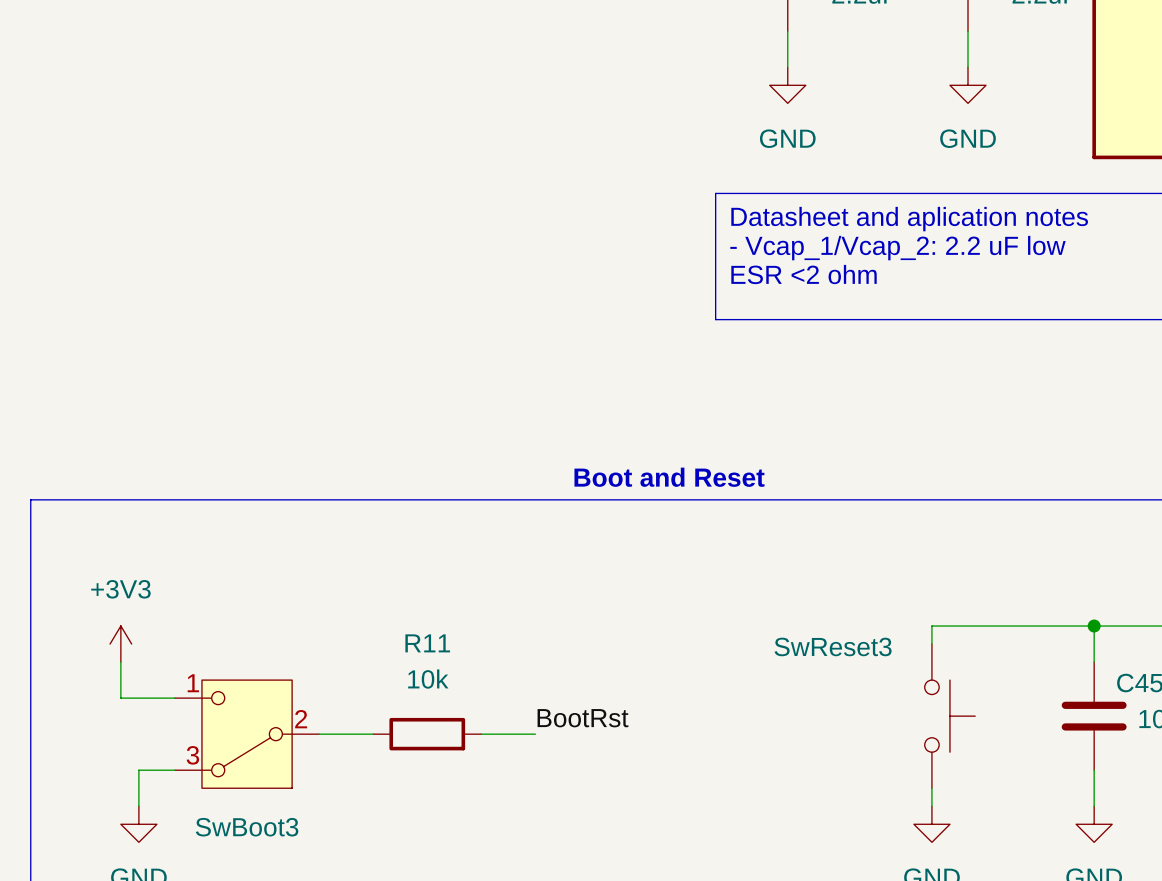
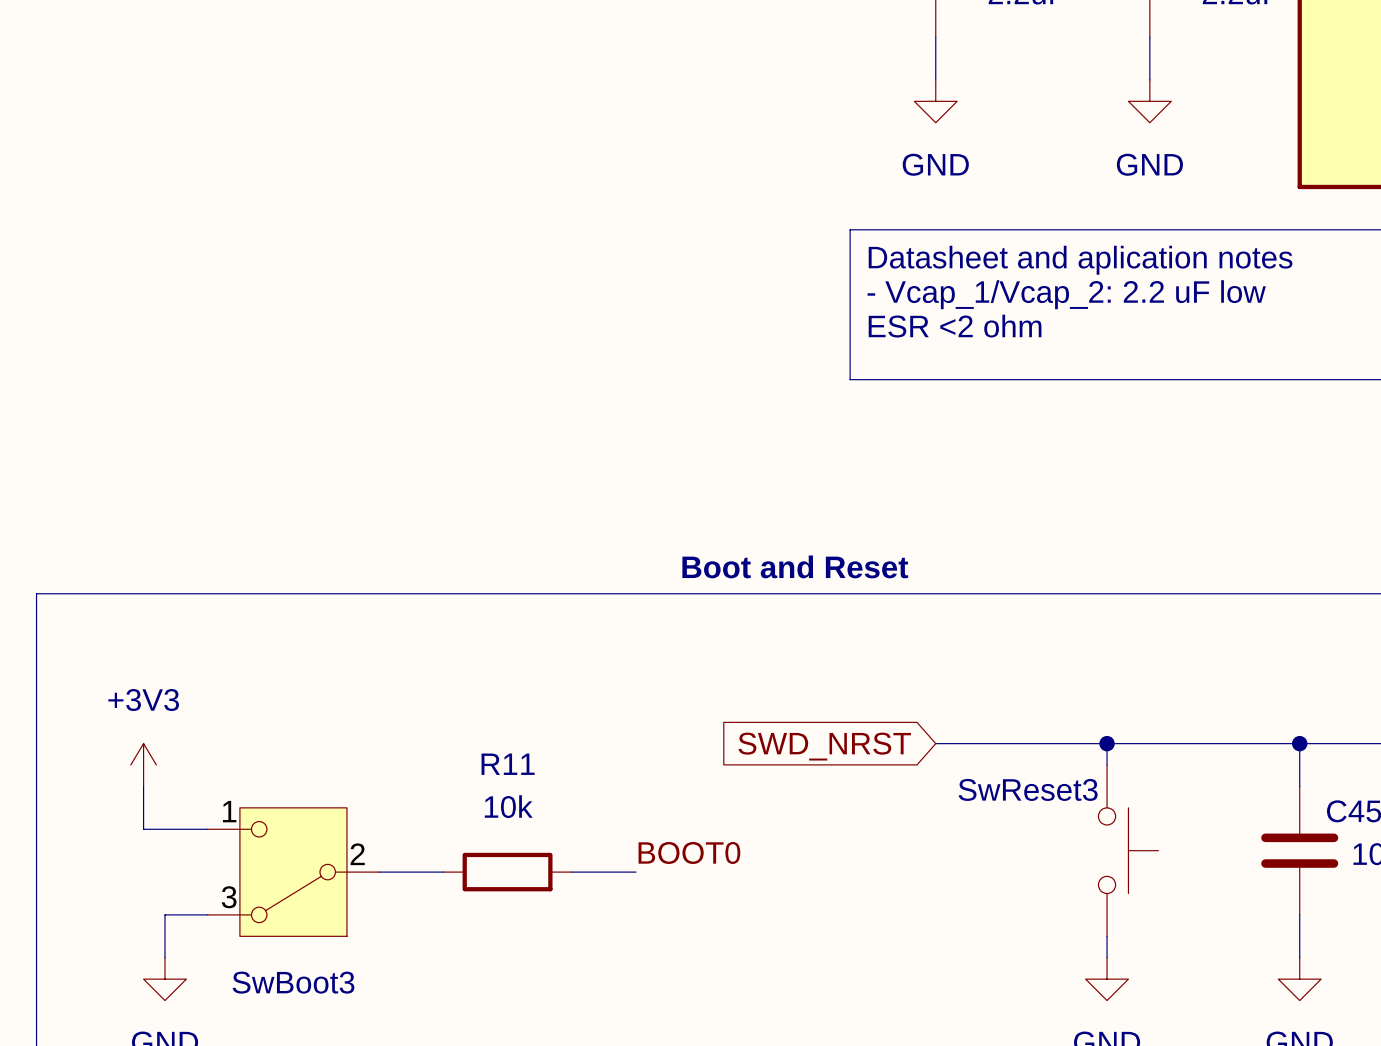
wire: none -> (935, 743) (1107, 743)
junction: none -> (1107, 743)
global label: none -> SWD_NRST (824, 746)
SwReset3 name position: SwReset3 (833, 646) -> SwReset3 (1028, 789)
label: BootRst (582, 718) -> BOOT0 (689, 852)

